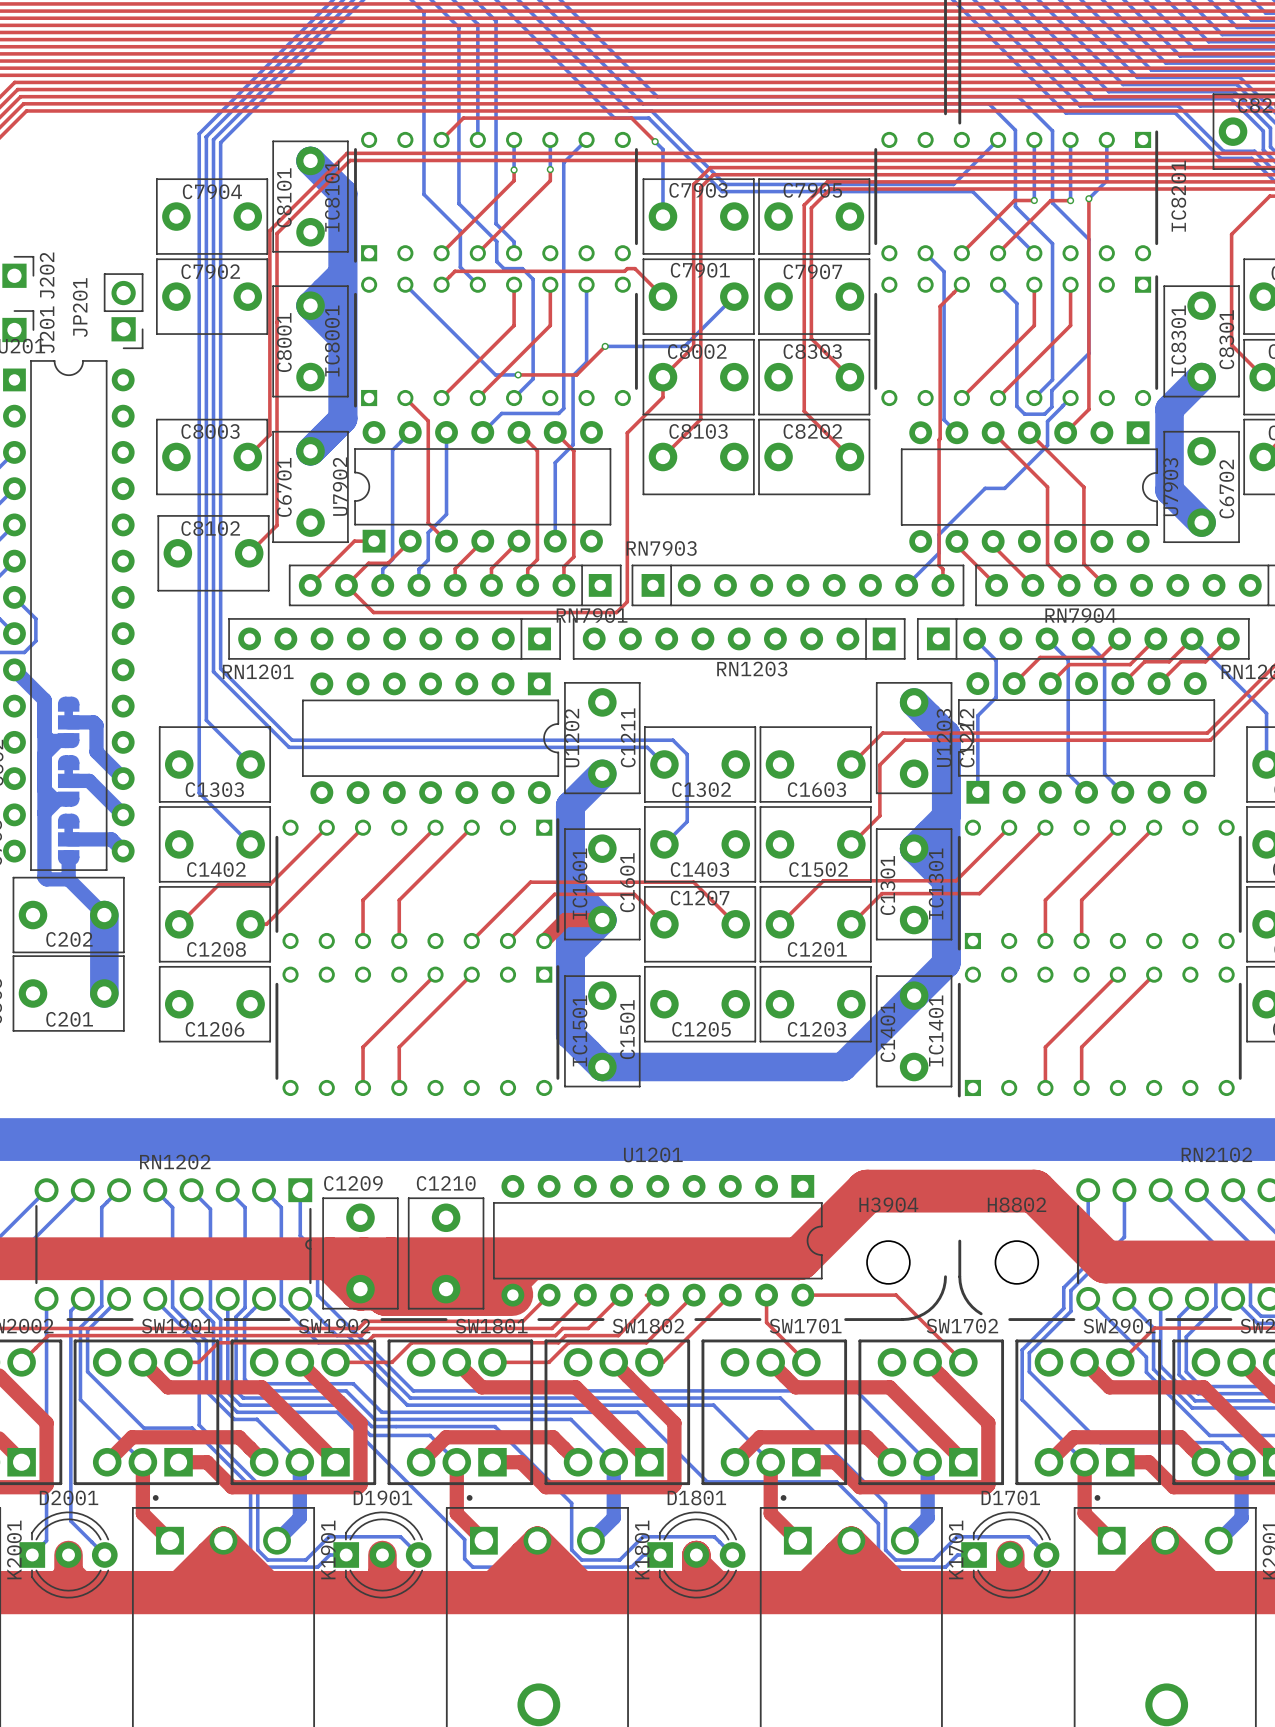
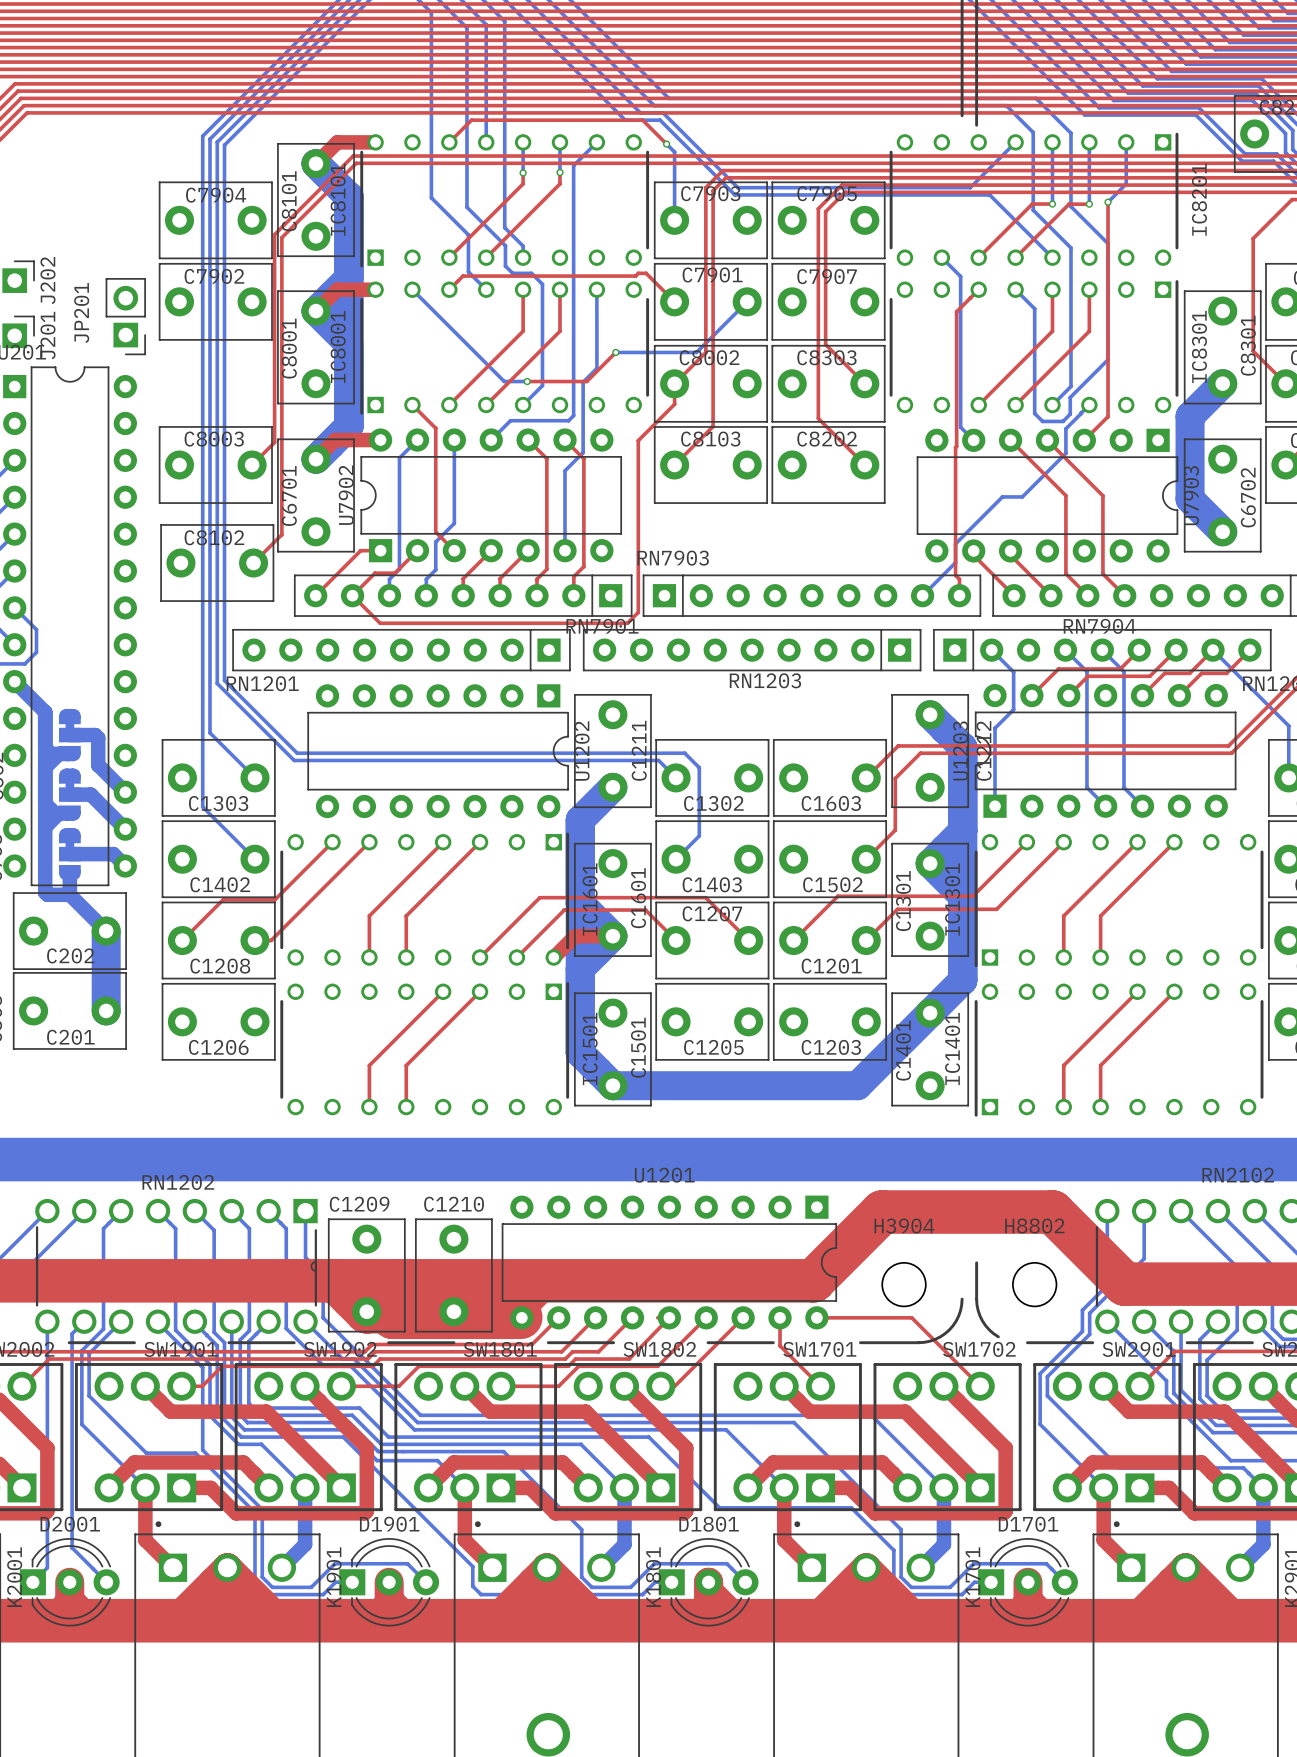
top track: none -> (375, 142) (337, 142) (315, 163)
top track: none -> (375, 289) (337, 289) (315, 311)
top track: none -> (380, 440) (335, 440) (315, 459)

